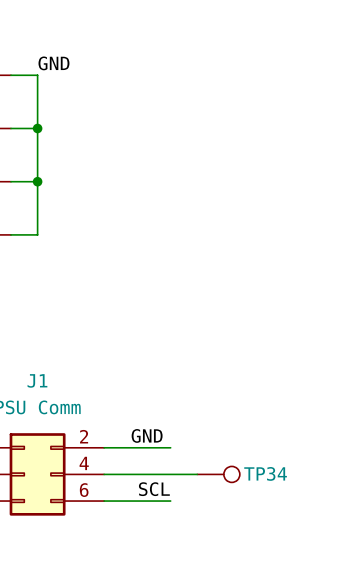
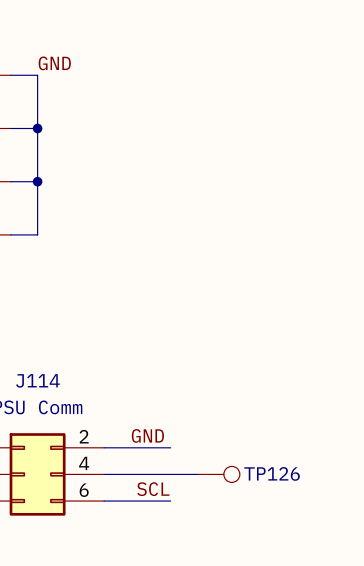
J1 name: J1 (37, 380) -> J114 (37, 380)
TP34 name: TP34 (265, 473) -> TP126 (272, 473)

